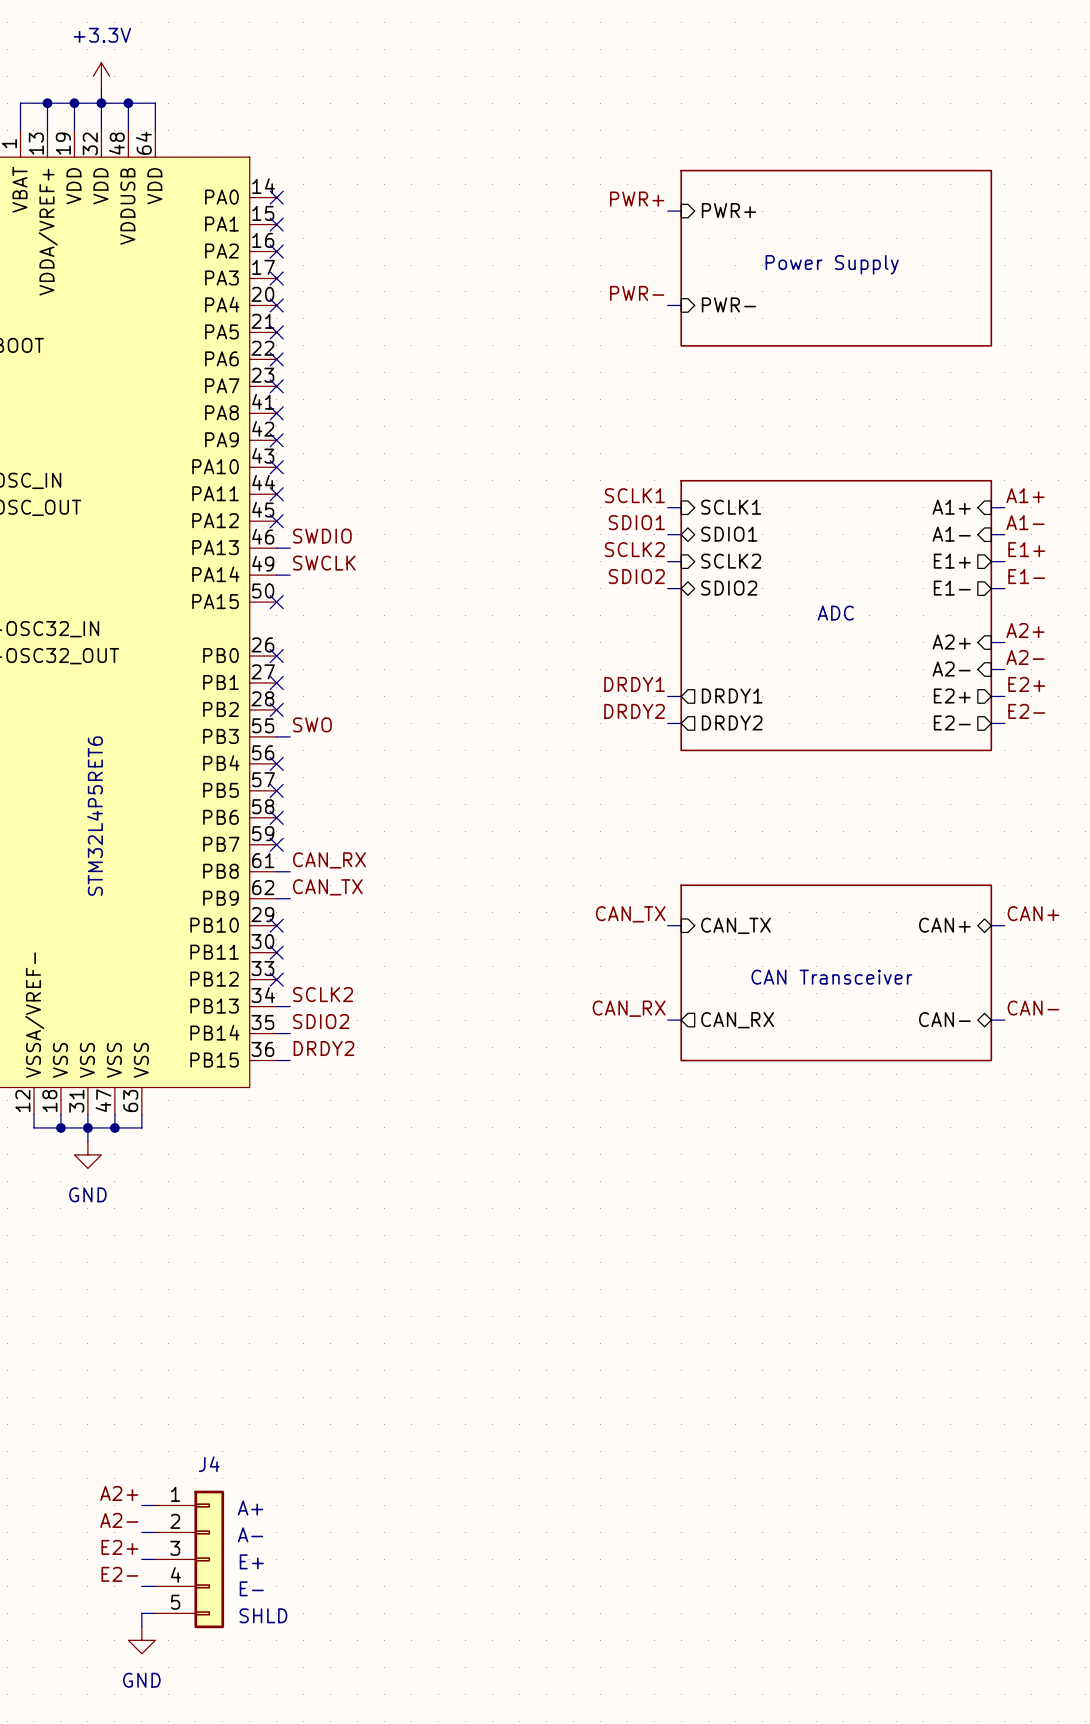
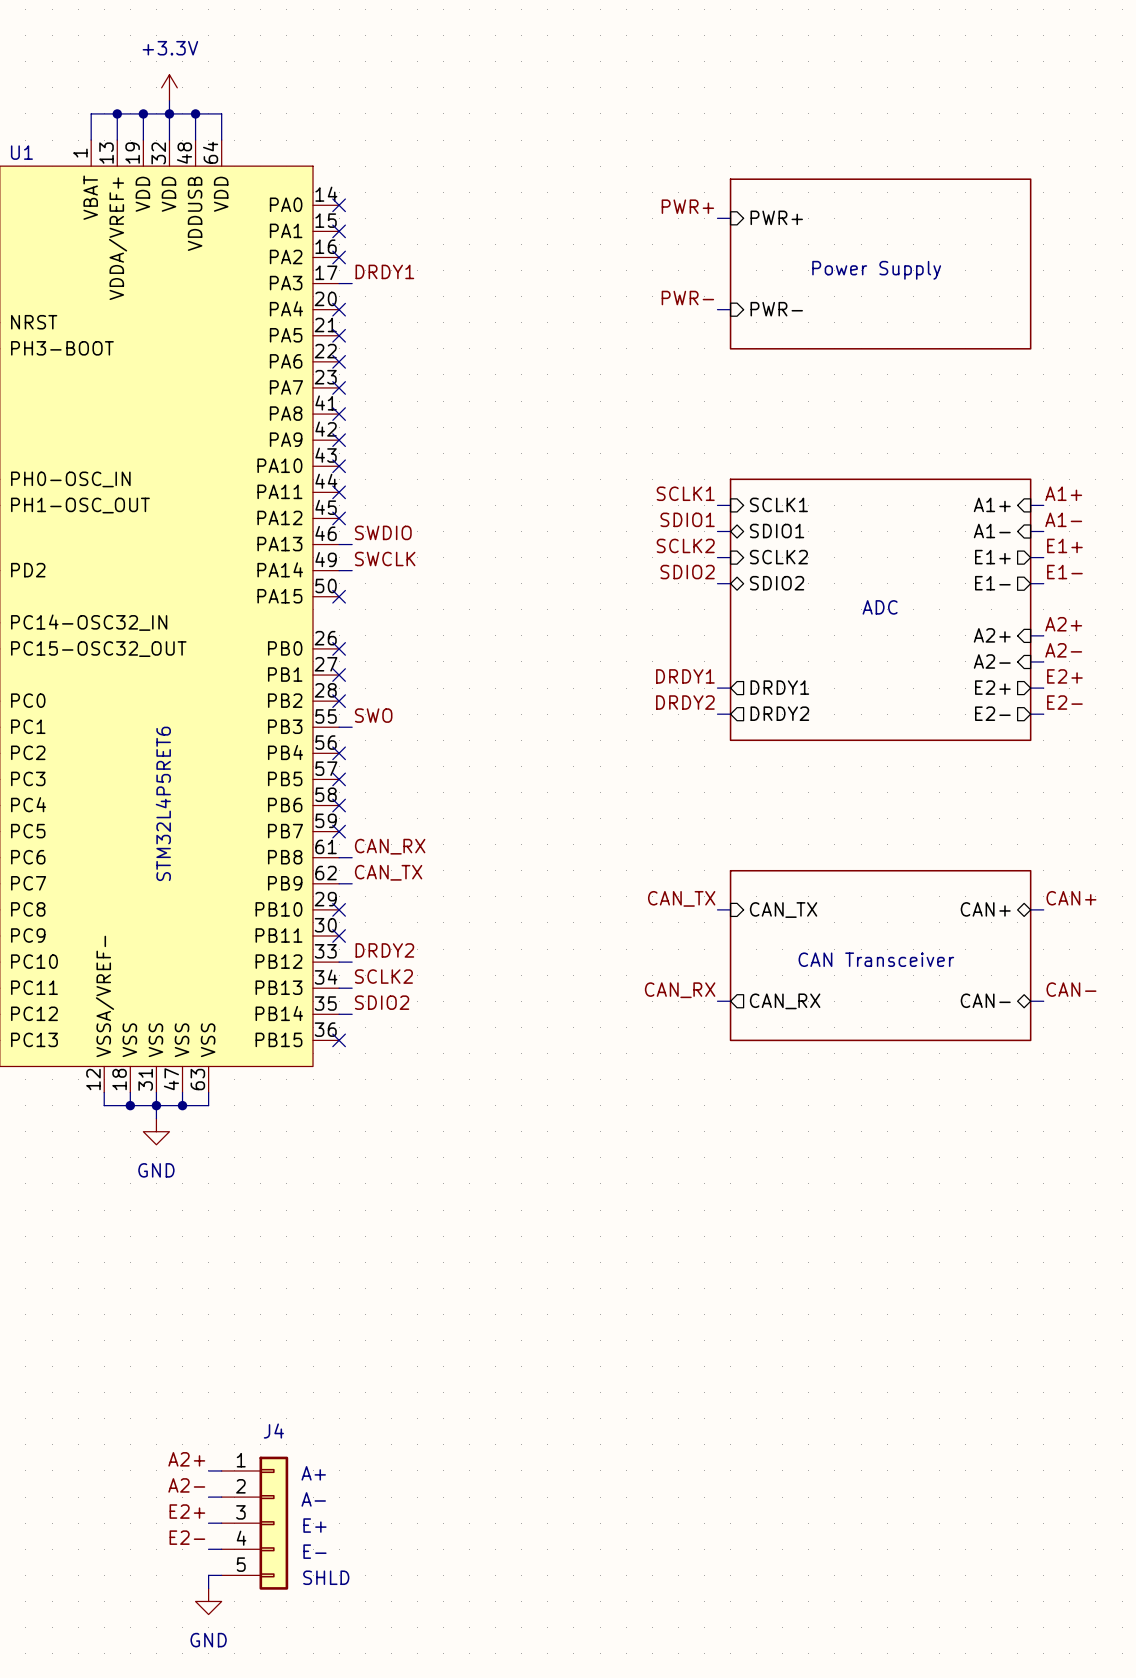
label: none -> DRDY1 (384, 271)
wire: none -> (339, 283) (352, 283)
no-connect mark: (276, 278) -> none
no-connect mark: (276, 979) -> none
label position: DRDY2 (323, 1048) -> DRDY2 (384, 950)
wire: (276, 1060) (290, 1060) -> (339, 962) (352, 962)
no-connect mark: none -> (339, 1040)

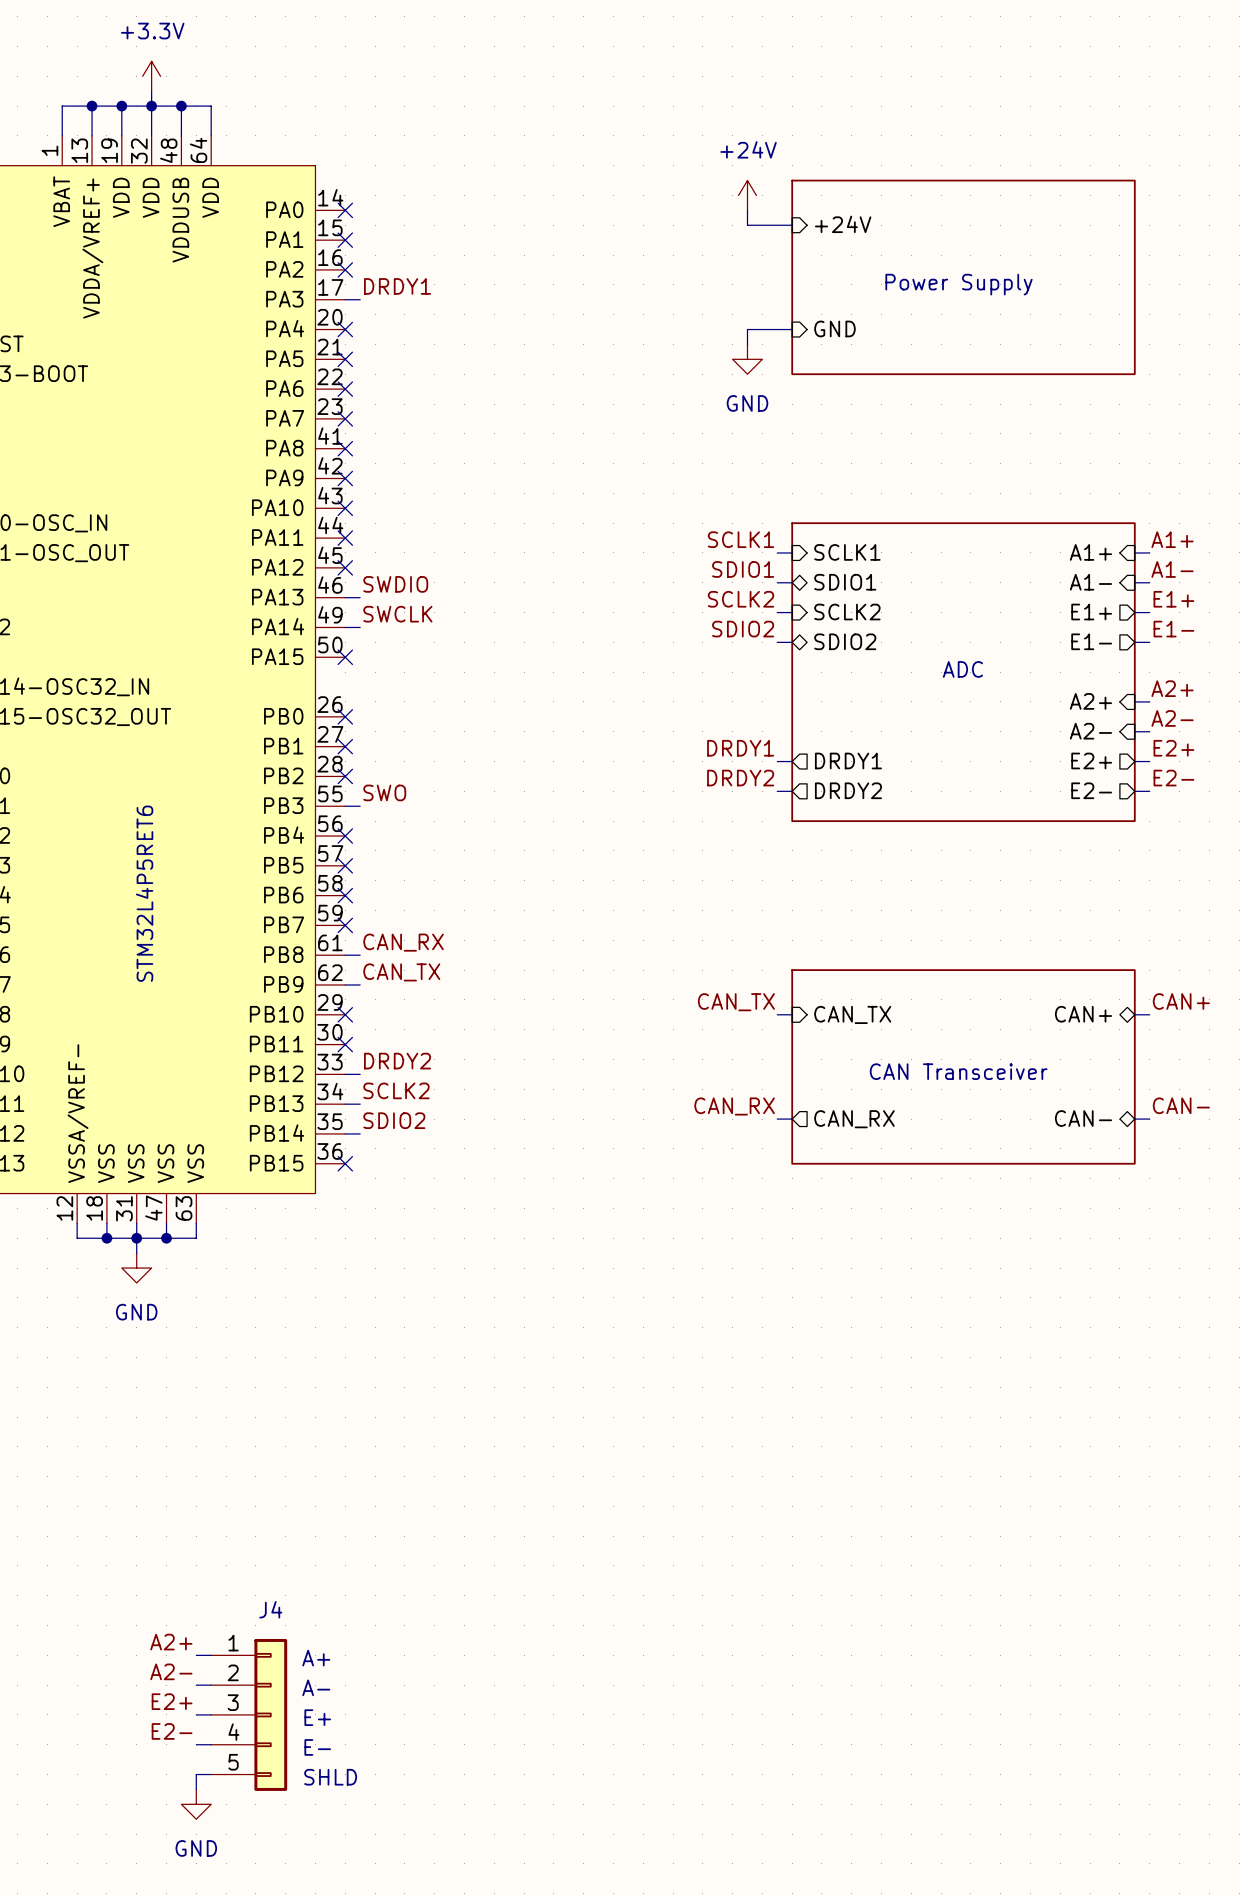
power symbol: none -> +24V (747, 195)
wire: none -> (747, 210) (747, 225) (777, 225)
label: PWR+ (687, 206) -> none
sheet pin: PWR+ (776, 217) -> +24V (843, 224)
label: PWR- (687, 298) -> none
wire: none -> (777, 329) (747, 329) (747, 344)
sheet pin: PWR- (776, 309) -> GND (834, 328)
power symbol: none -> GND (747, 359)

